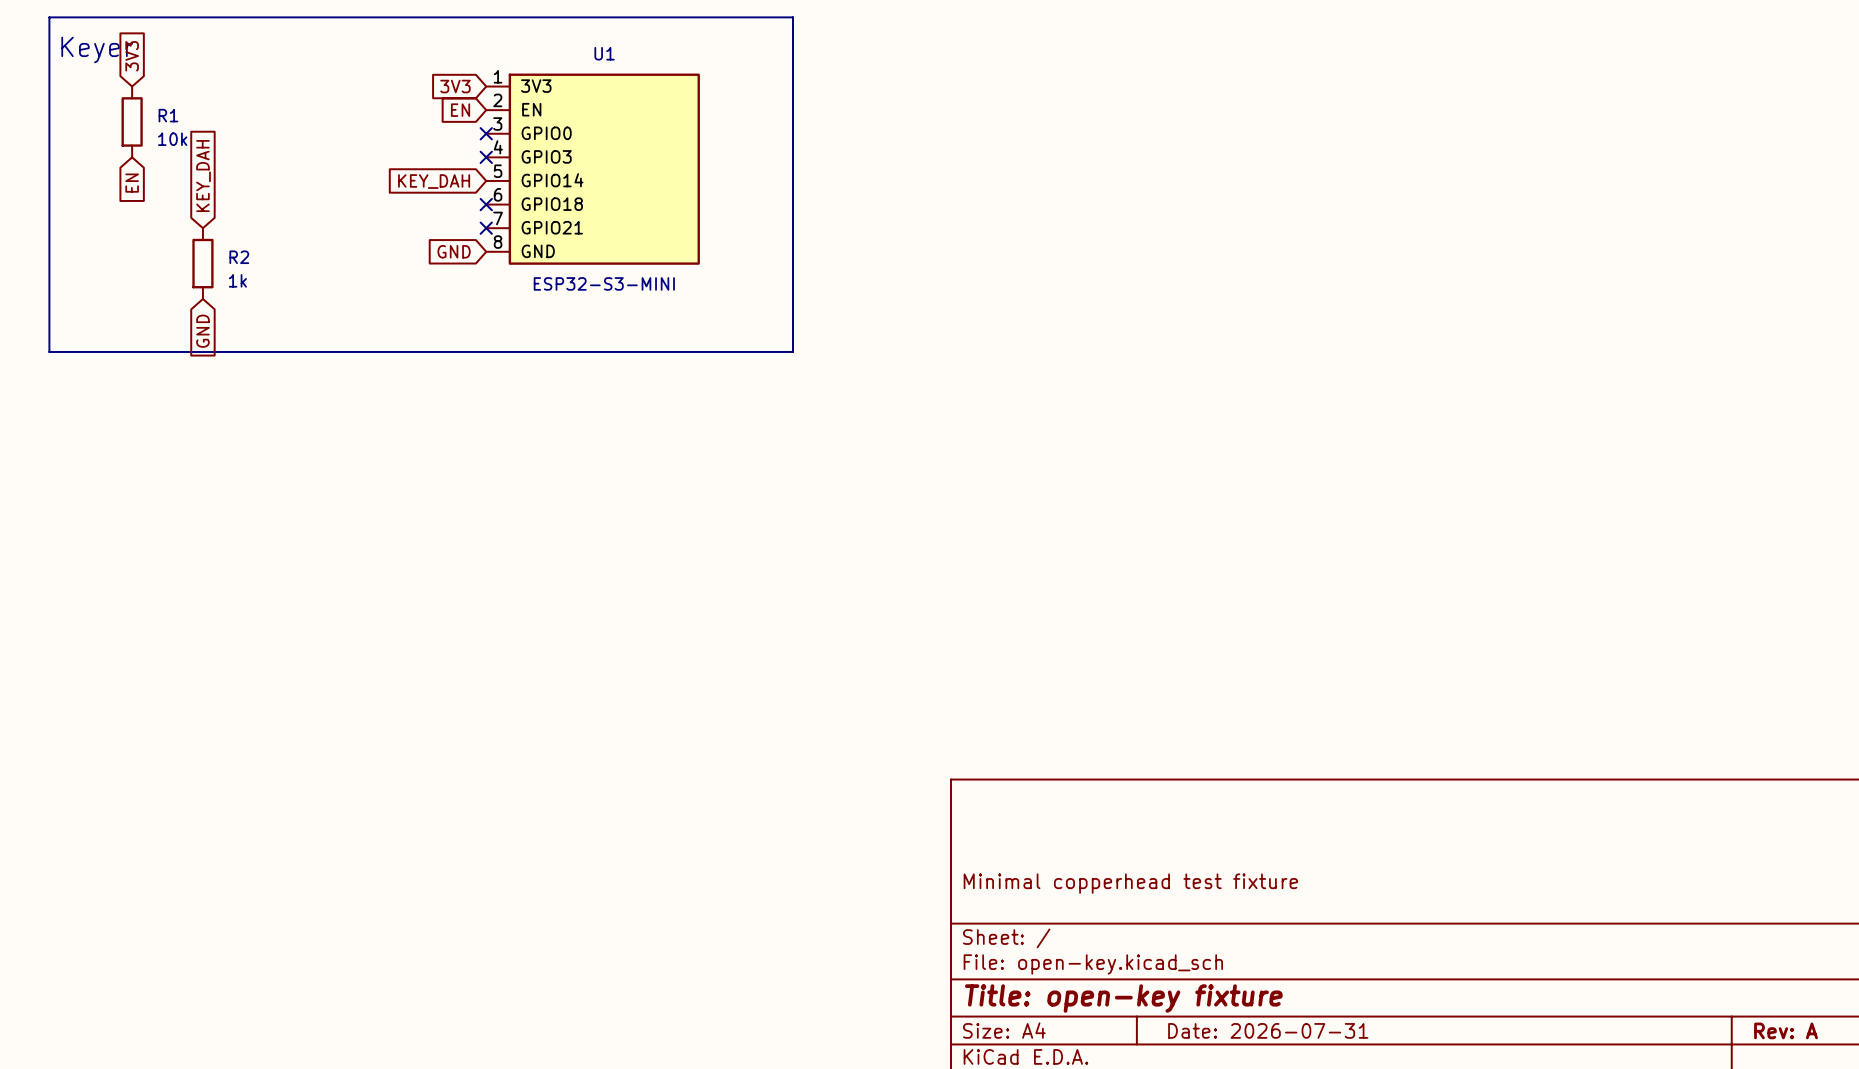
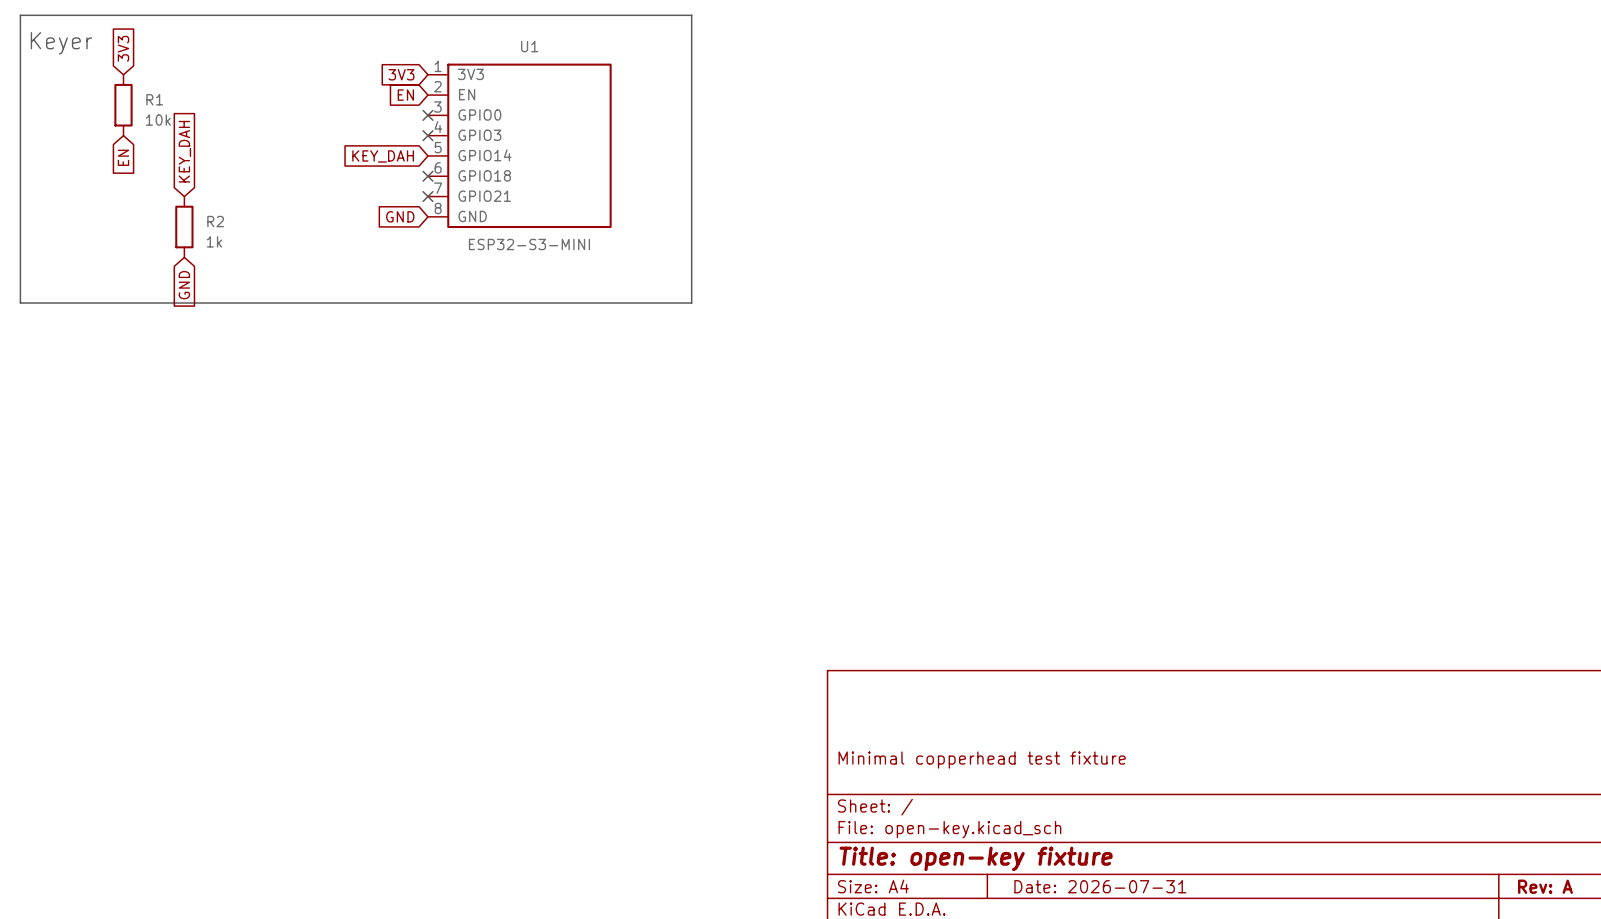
line: (49, 17) (49, 351) -> (52, 15) (20, 15) (20, 303) (52, 303)
text position: Keyer (97, 49) -> Keyer (61, 43)

